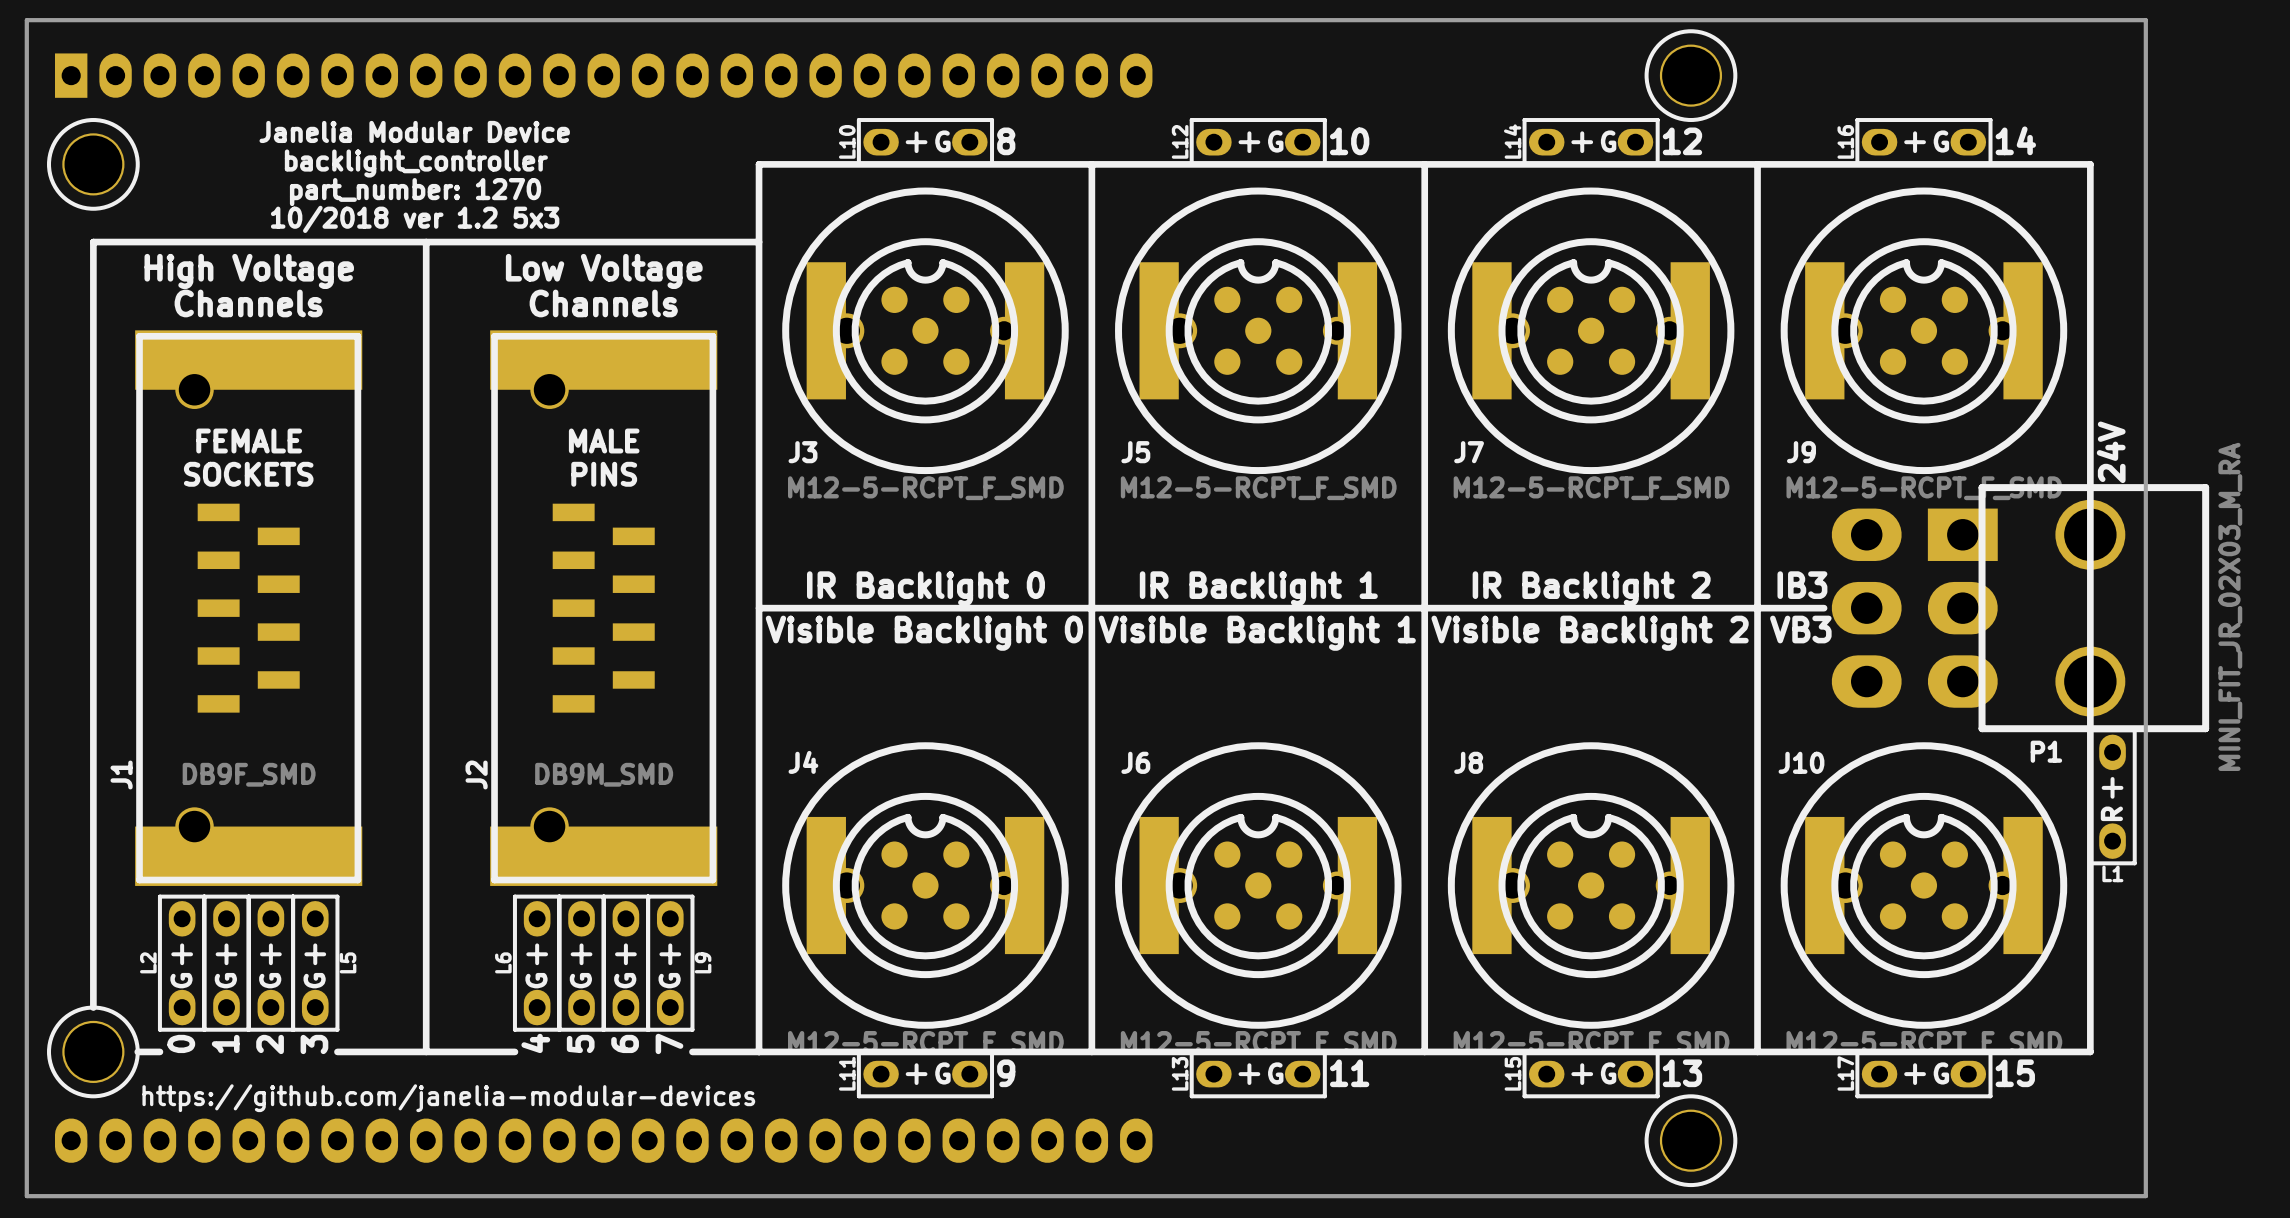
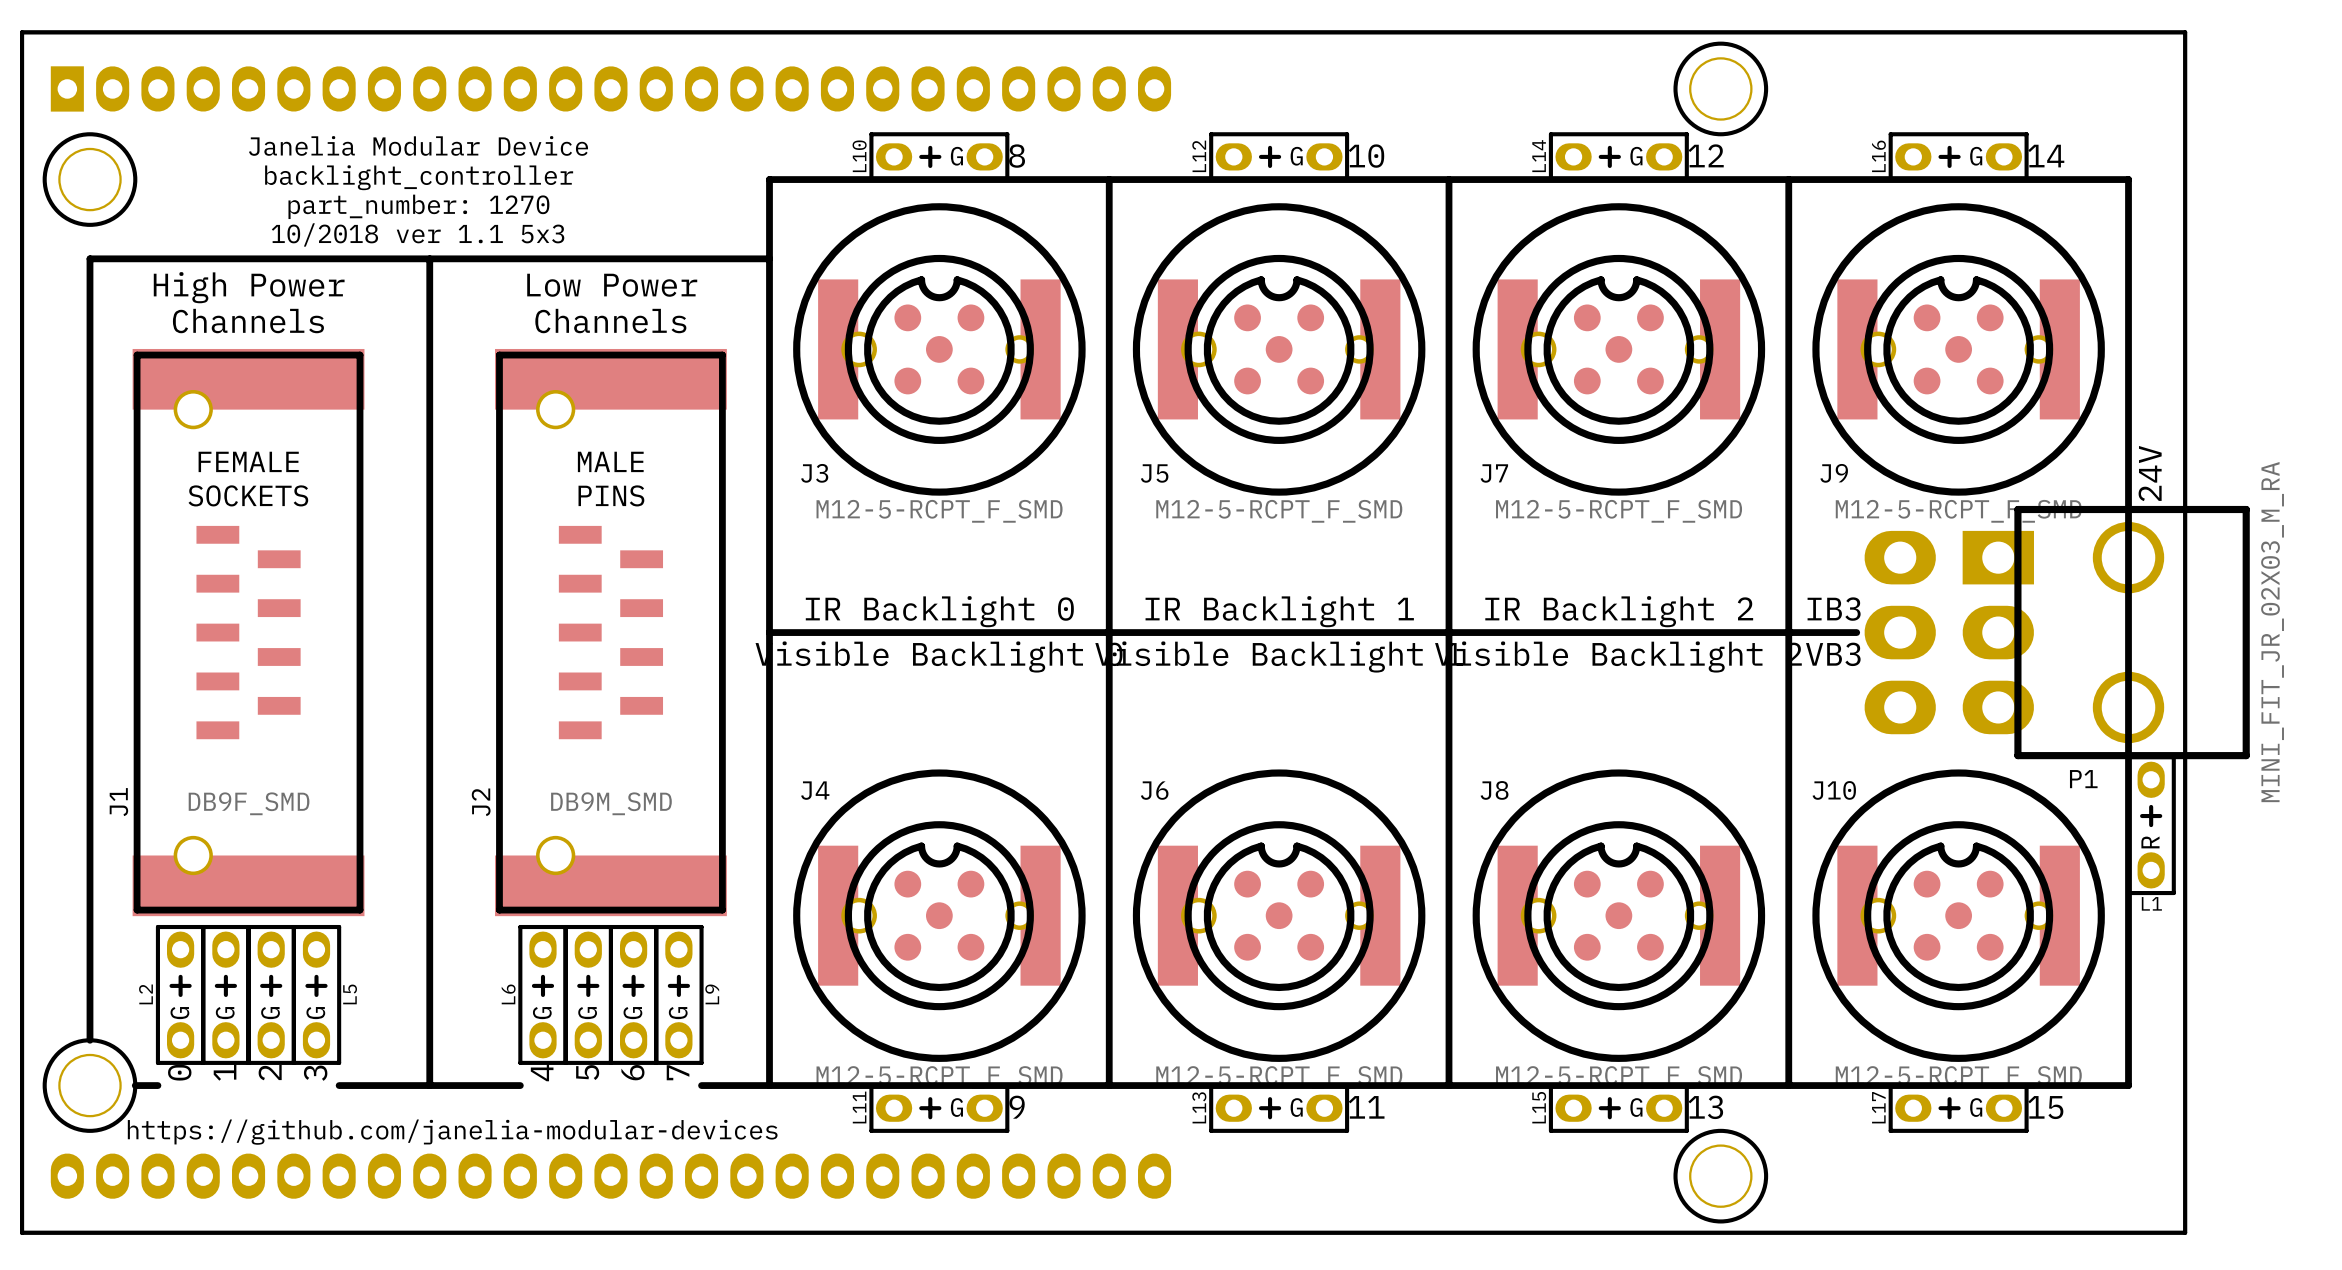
text: 10/2018 ver 1.2 5x3 (415, 219) -> 10/2018 ver 1.1 5x3 (418, 234)
text: High Voltage (249, 271) -> High Power (249, 287)
text: Low Voltage (604, 271) -> Low Power (612, 285)

